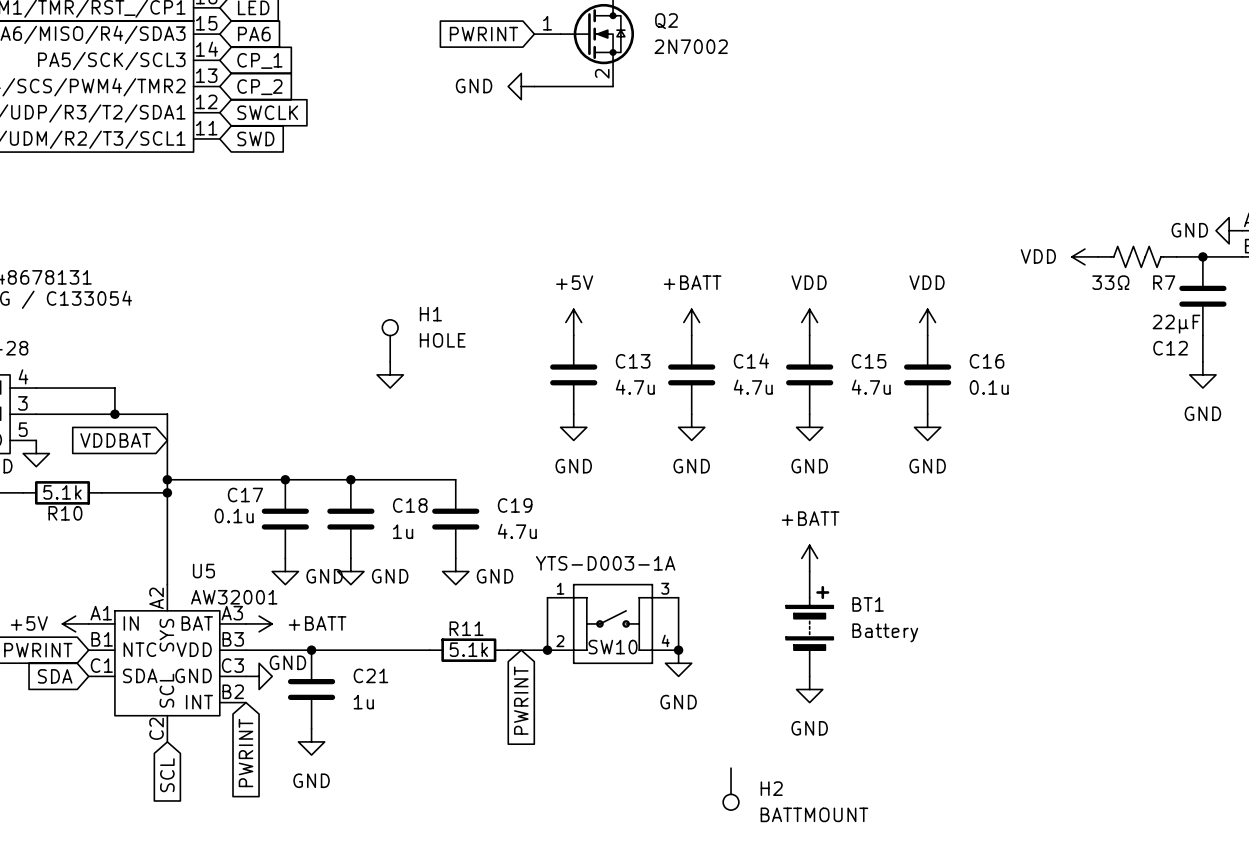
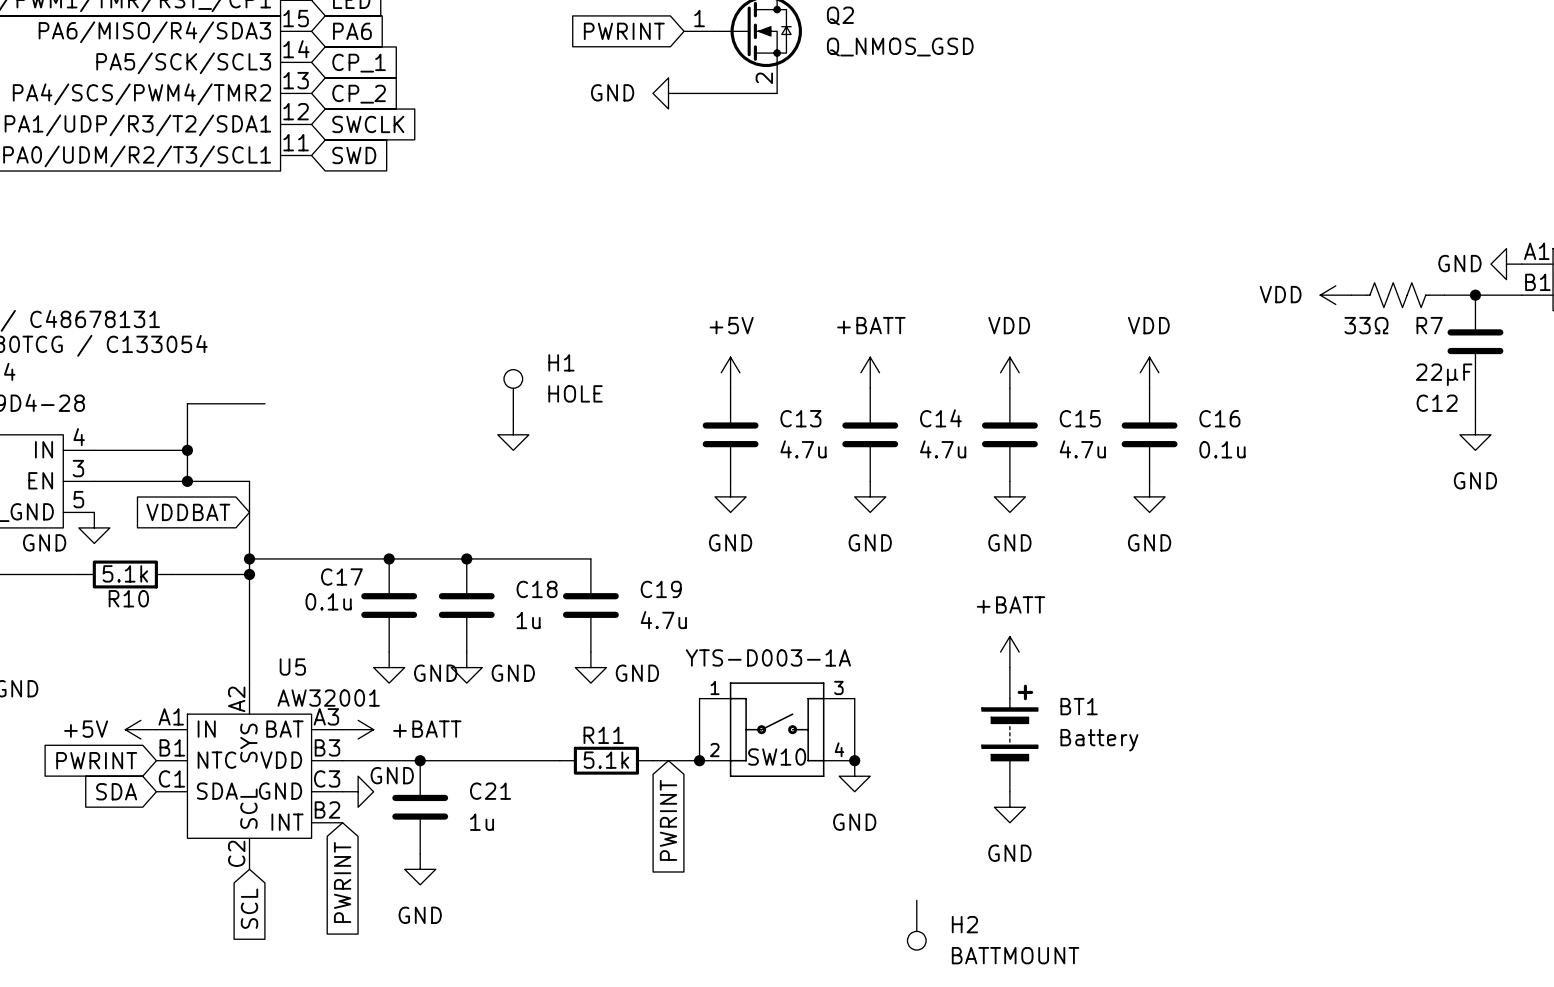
Q2 value: 2N7002 (691, 46) -> Q_NMOS_GSD (900, 47)
wire: none -> (265, 403) (187, 403) (187, 450)
junction: none -> (187, 450)

